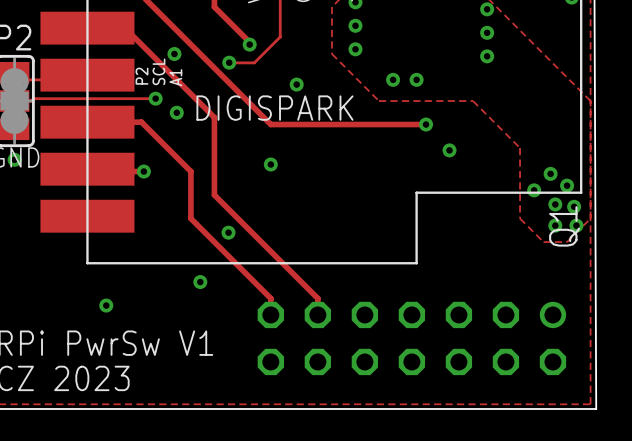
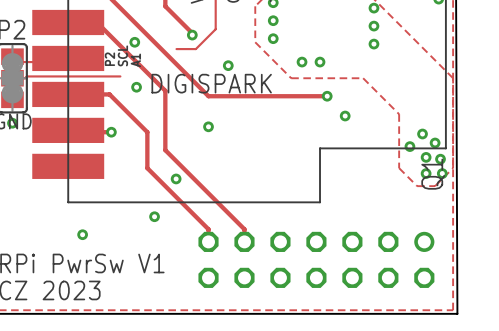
via: (229, 62) -> none
via: (155, 98) -> none

